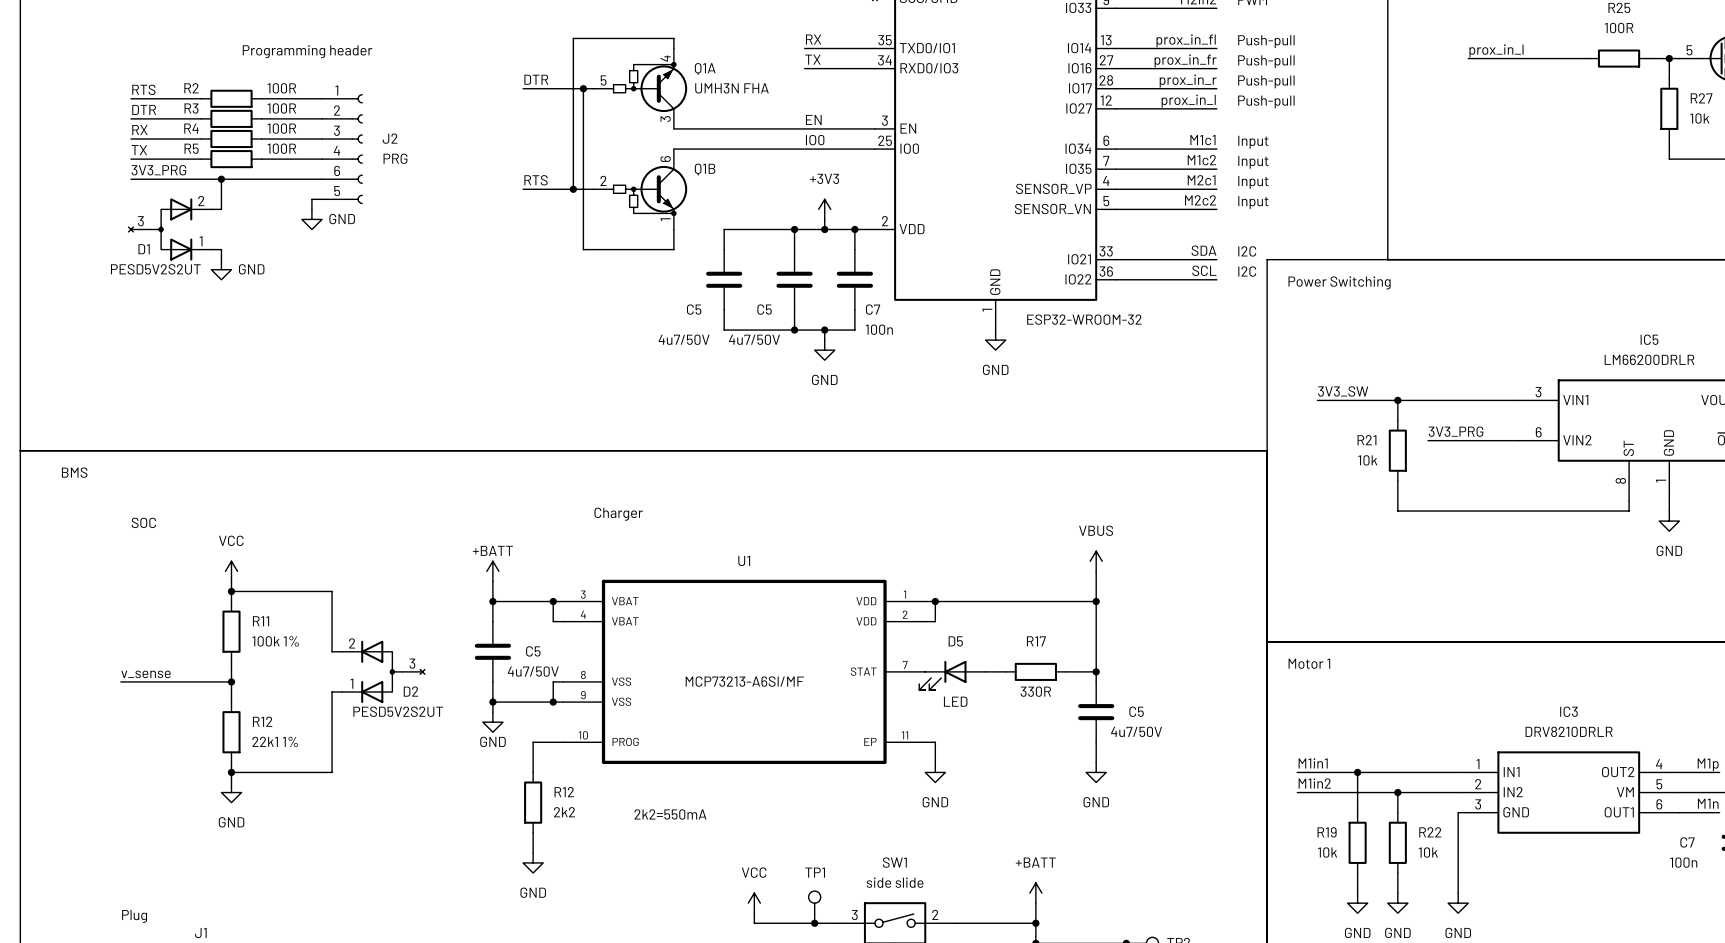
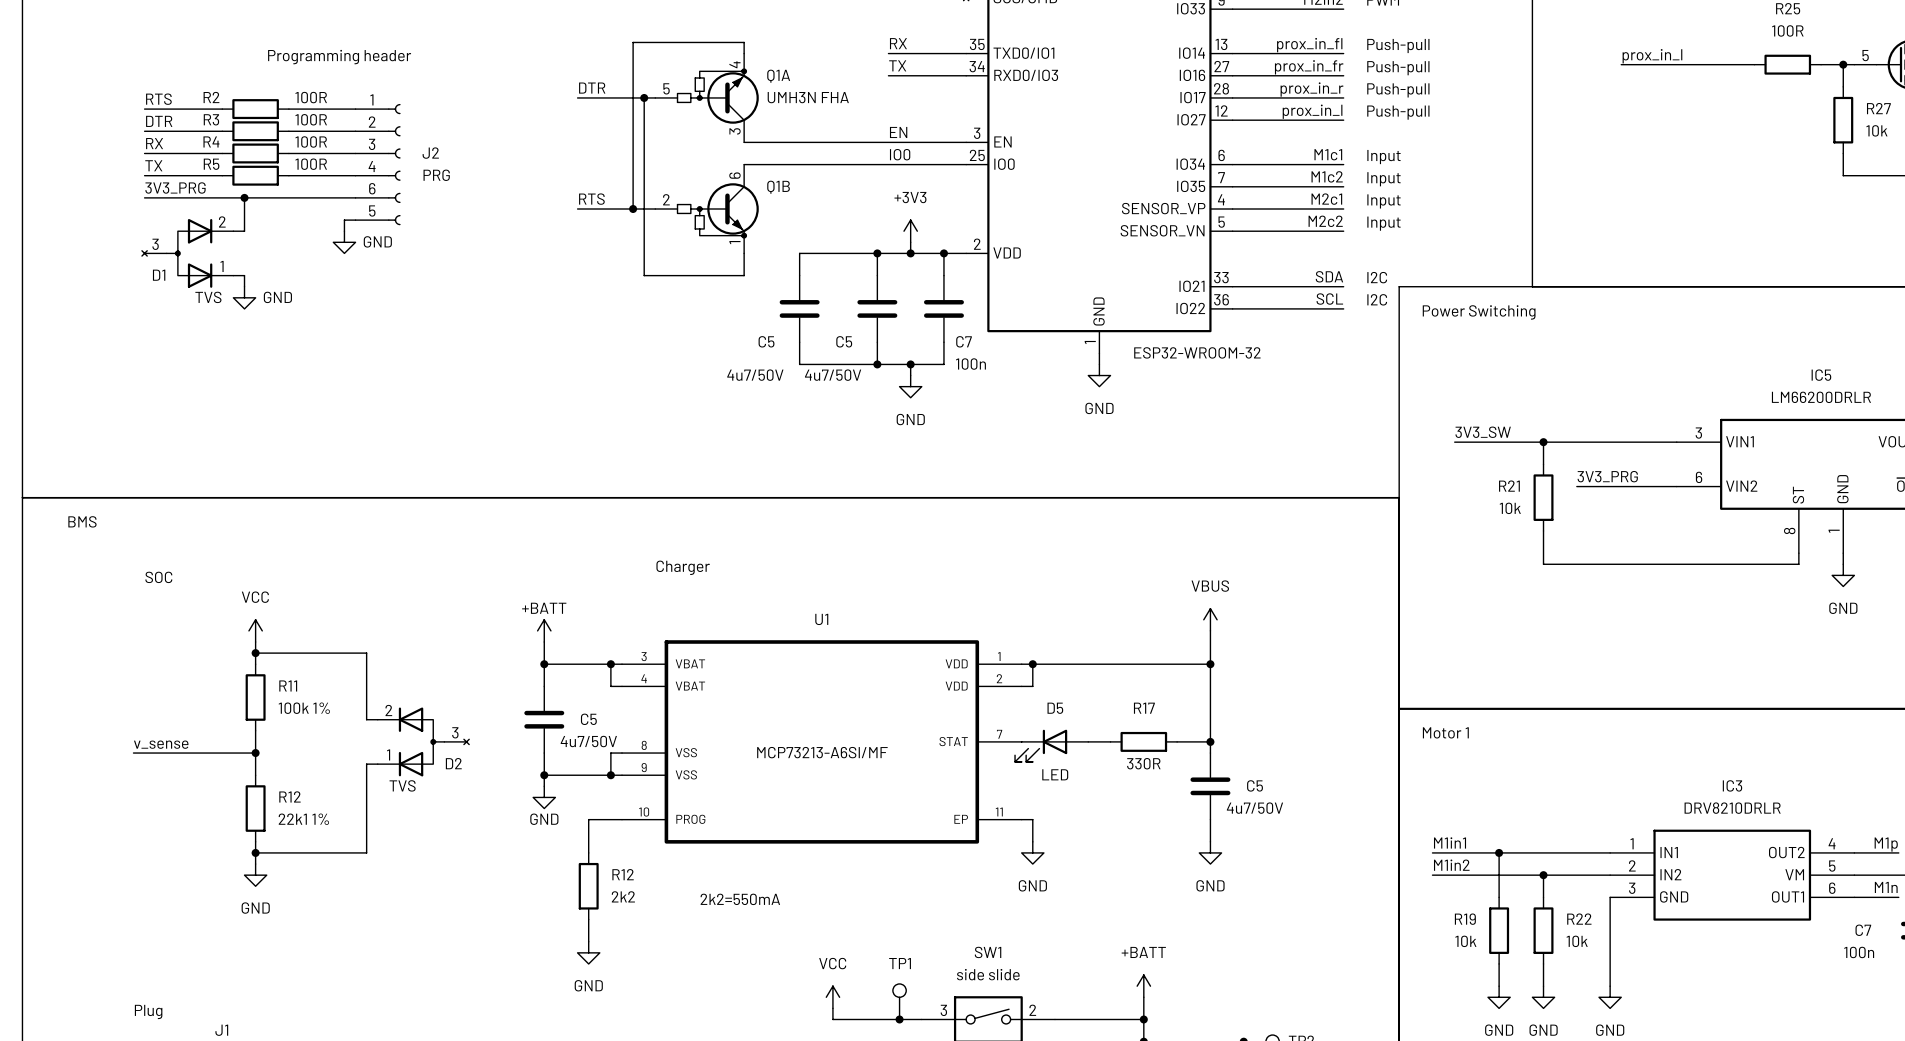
D1 value: PESD5V2S2UT (155, 269) -> TVS (208, 297)
D2 value: PESD5V2S2UT (398, 711) -> TVS (402, 785)

